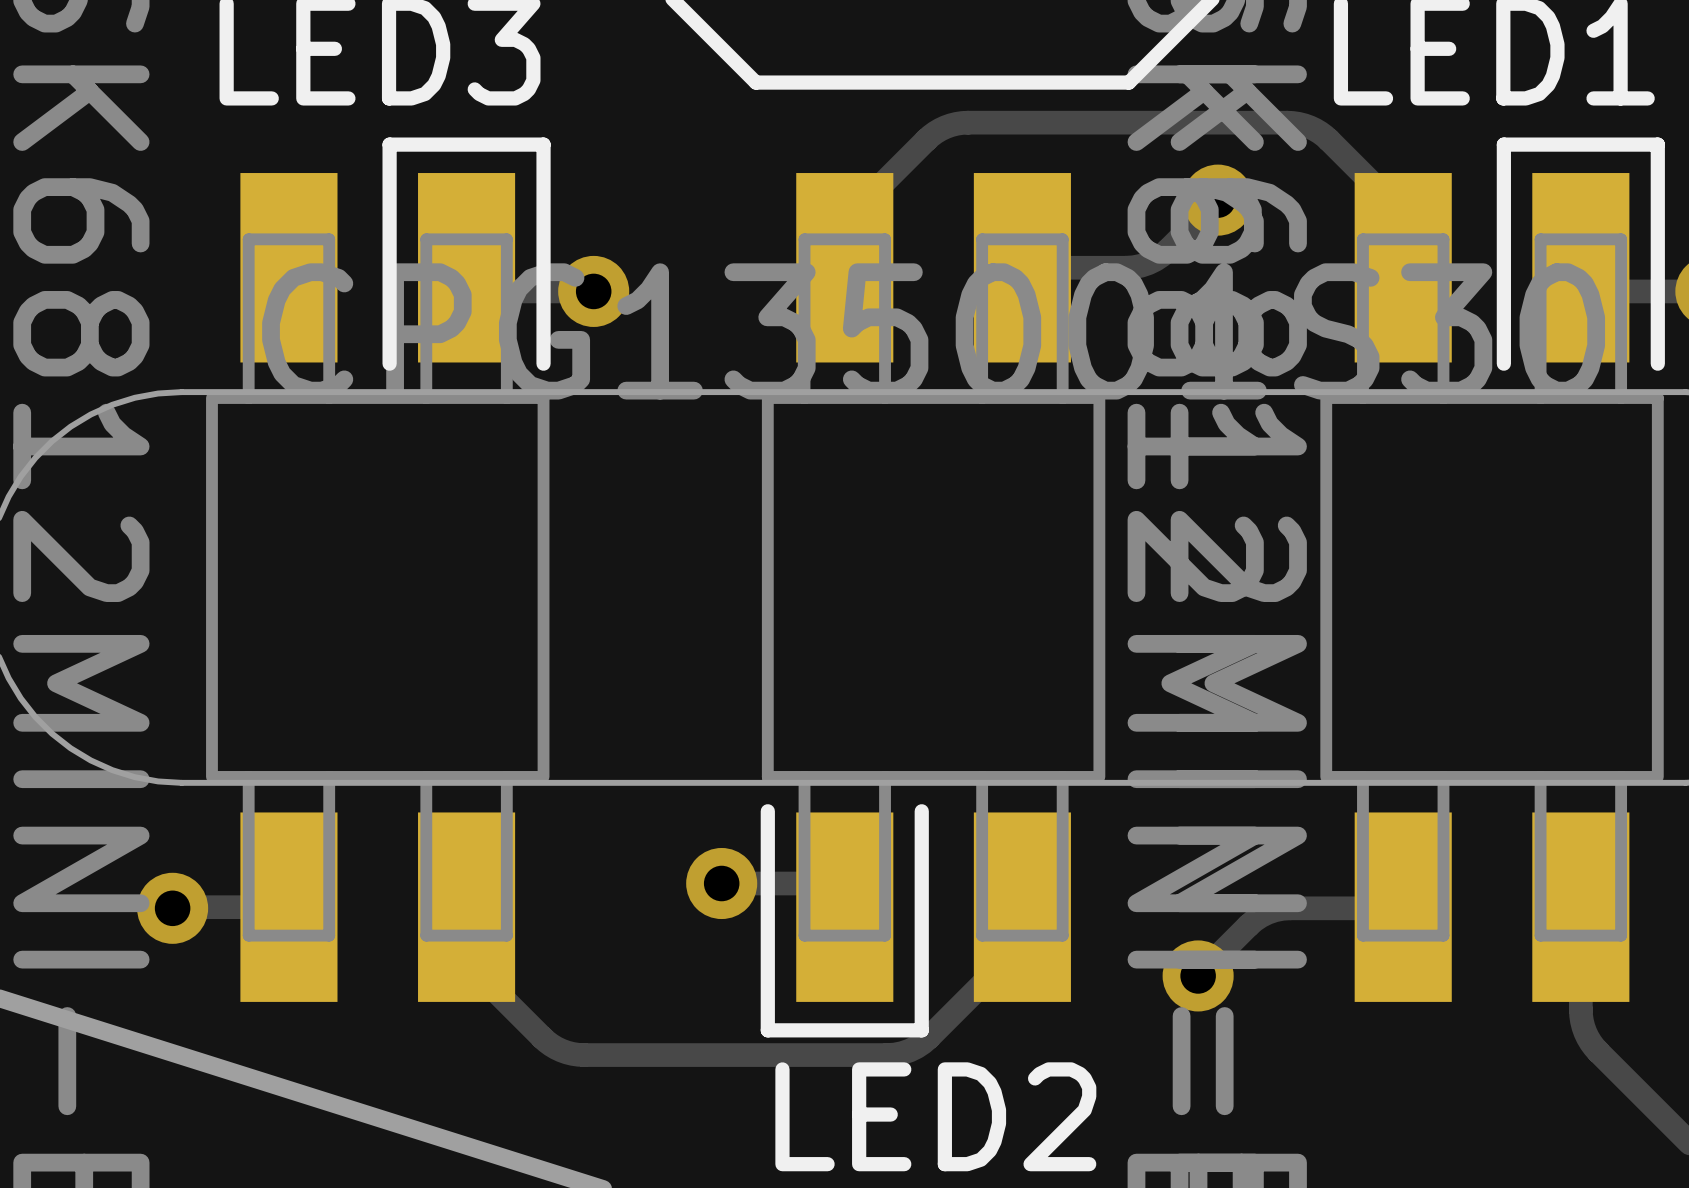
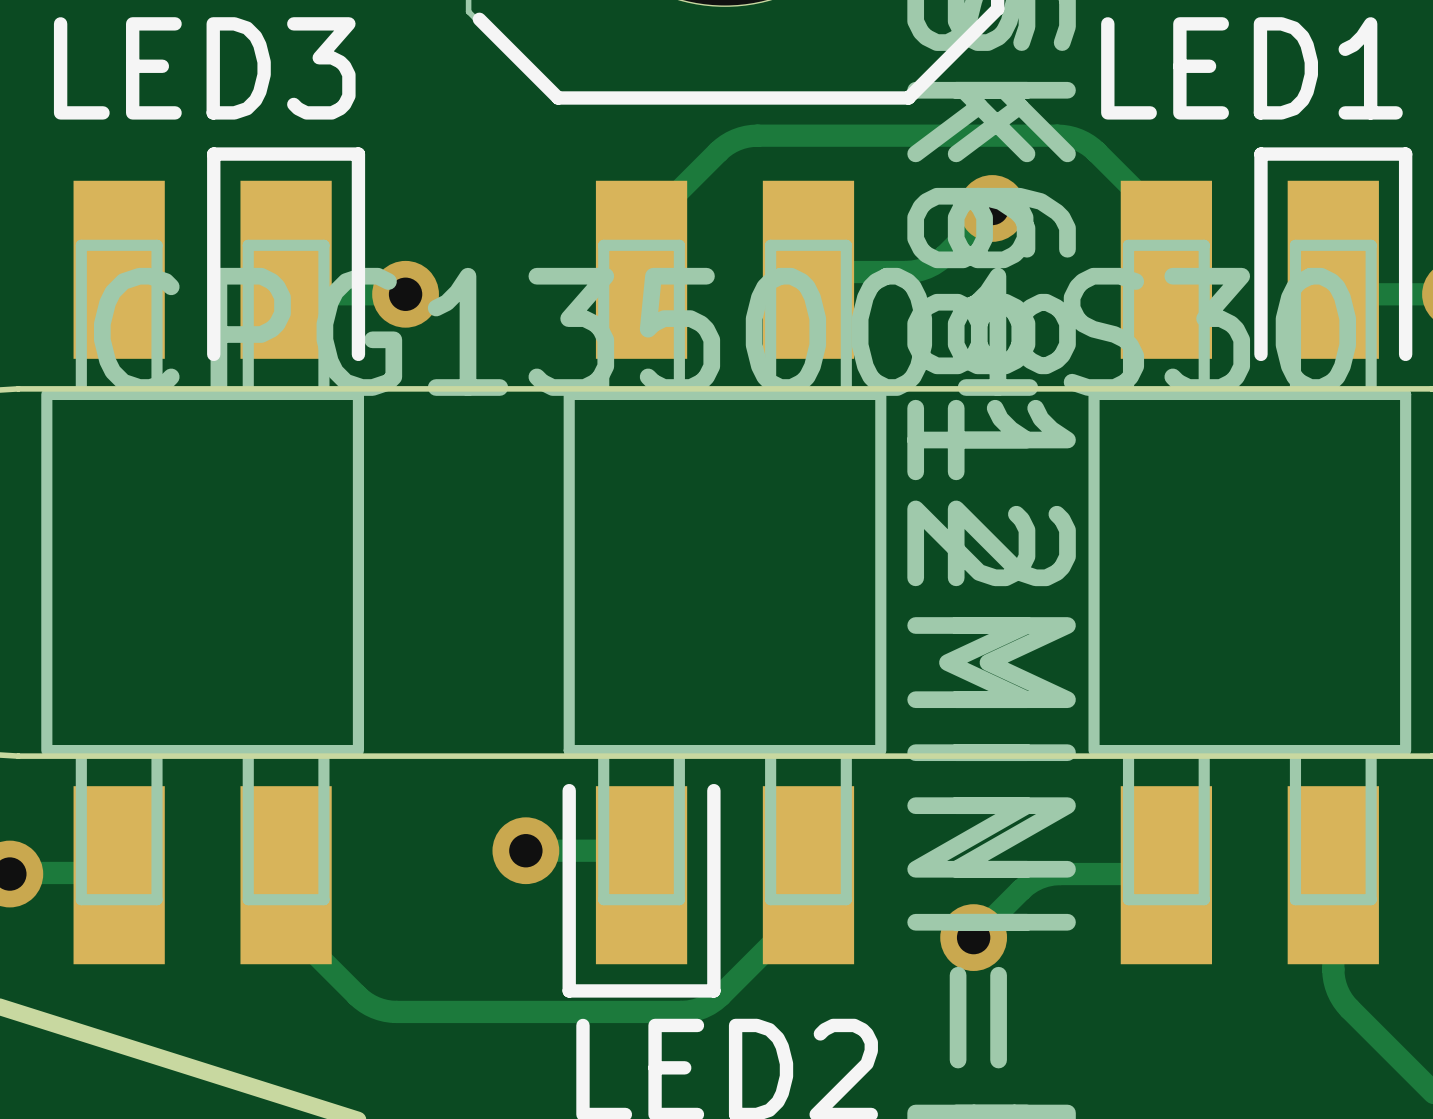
LED3 footprint: [206, 137, 551, 1002] -> [41, 147, 366, 965]
LED1 footprint: [1320, 137, 1665, 1002] -> [1088, 147, 1413, 965]
LED2 footprint: [760, 173, 1106, 1038] -> [562, 180, 887, 998]

